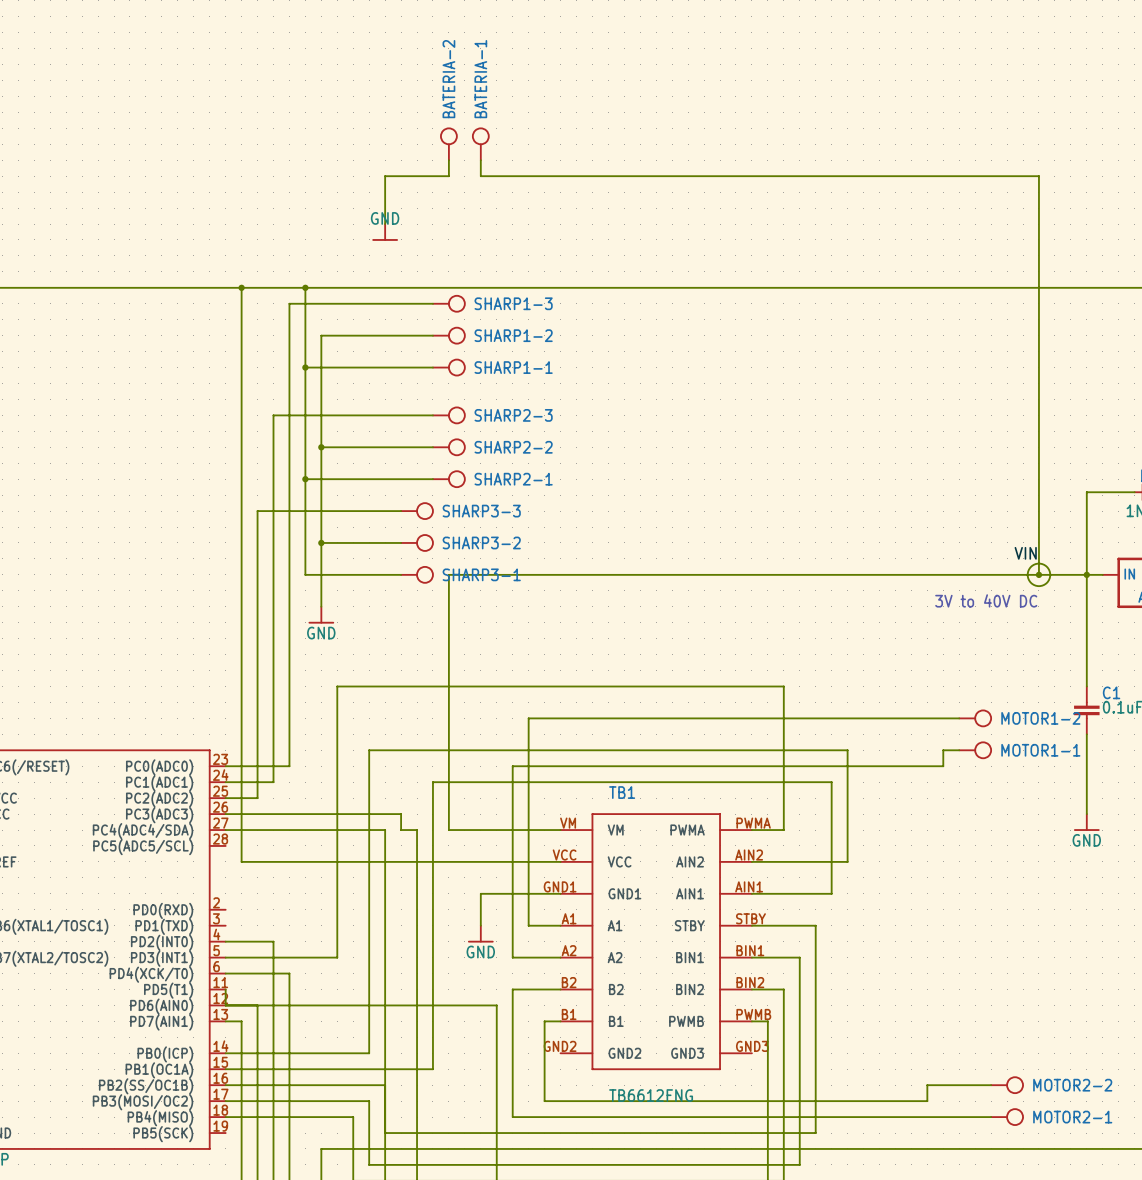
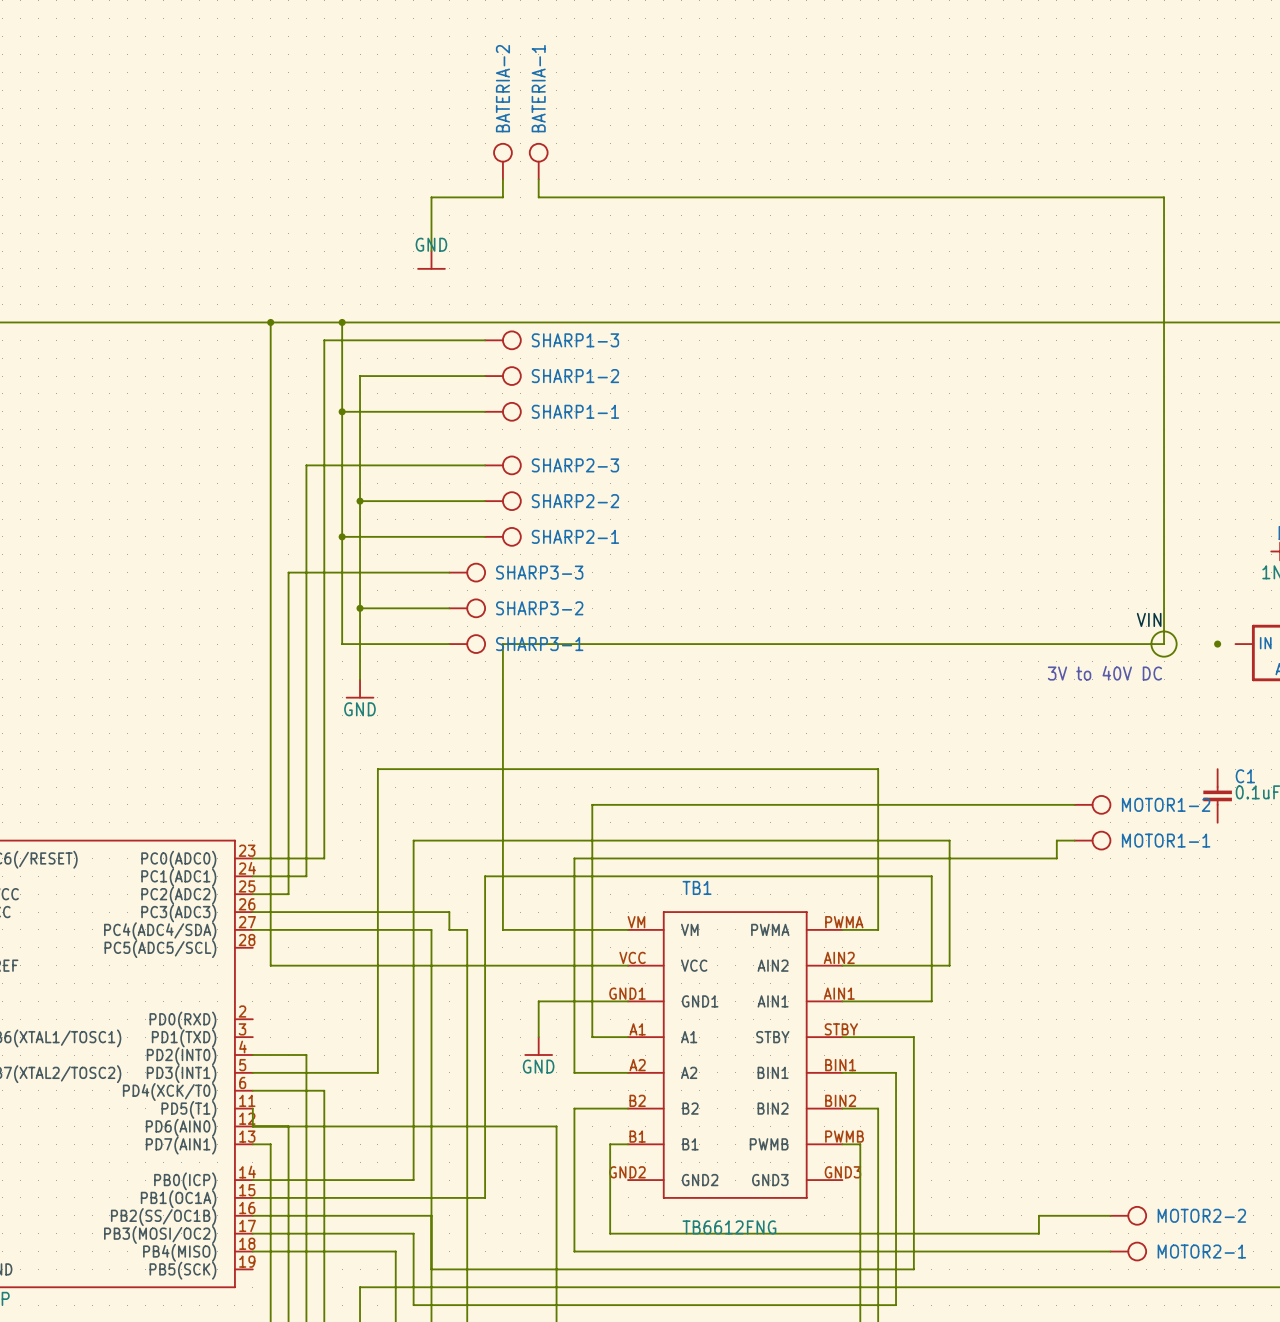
wire: (1134, 492) (1086, 492) (1086, 686) -> none
wire: (1038, 574) (1102, 574) -> none
junction: (1038, 574) -> none
wire: (1086, 734) (1086, 814) -> none
power symbol: GND (1086, 822) -> none

